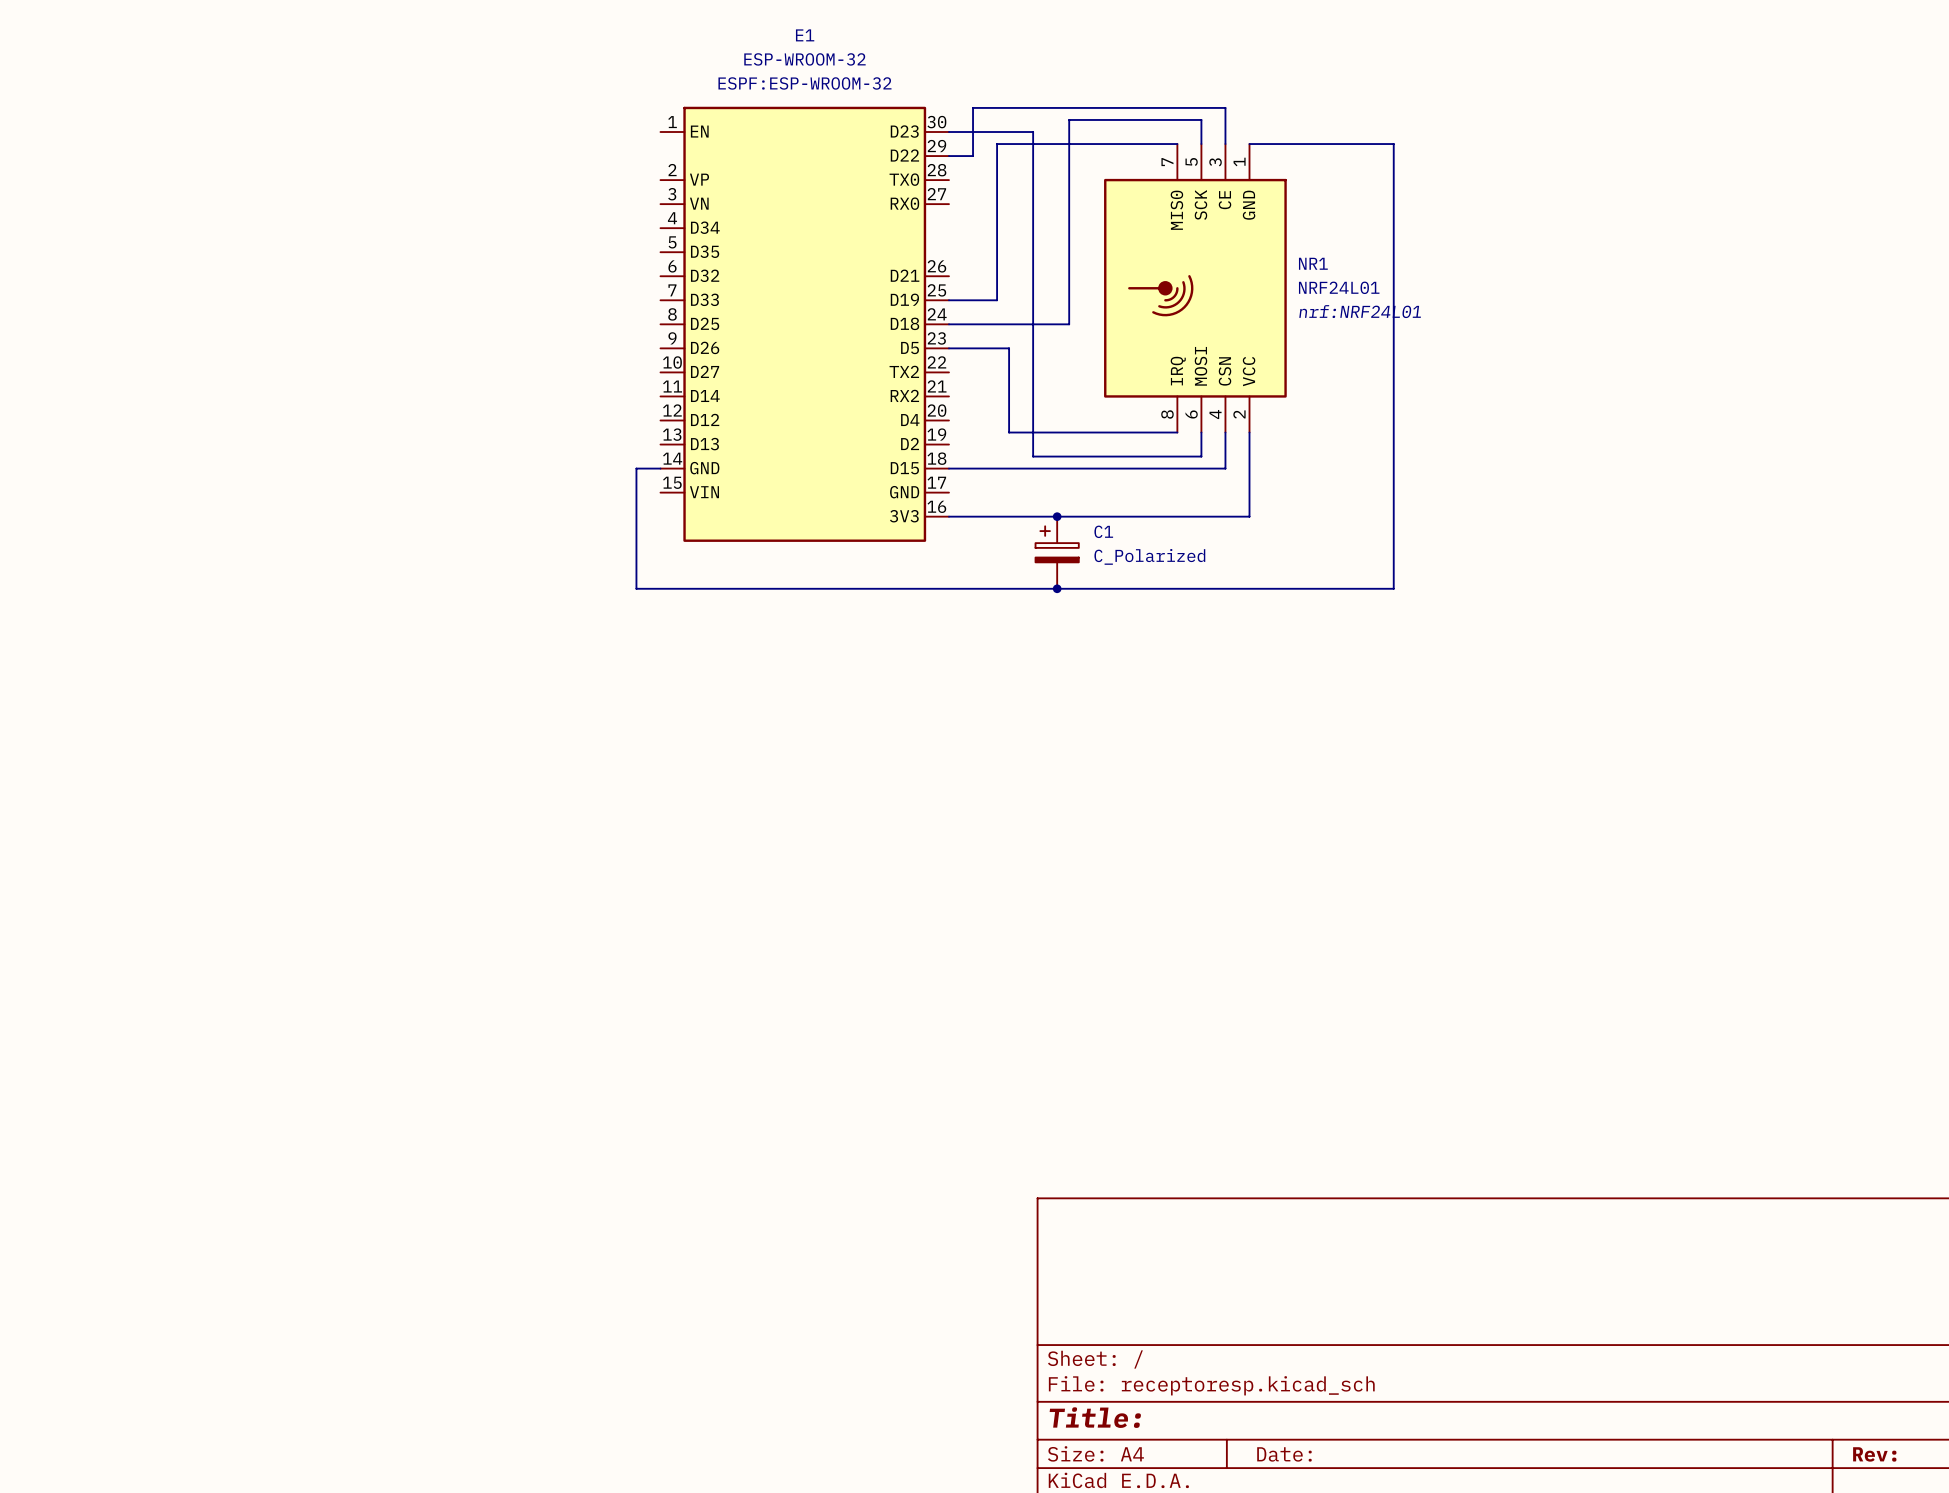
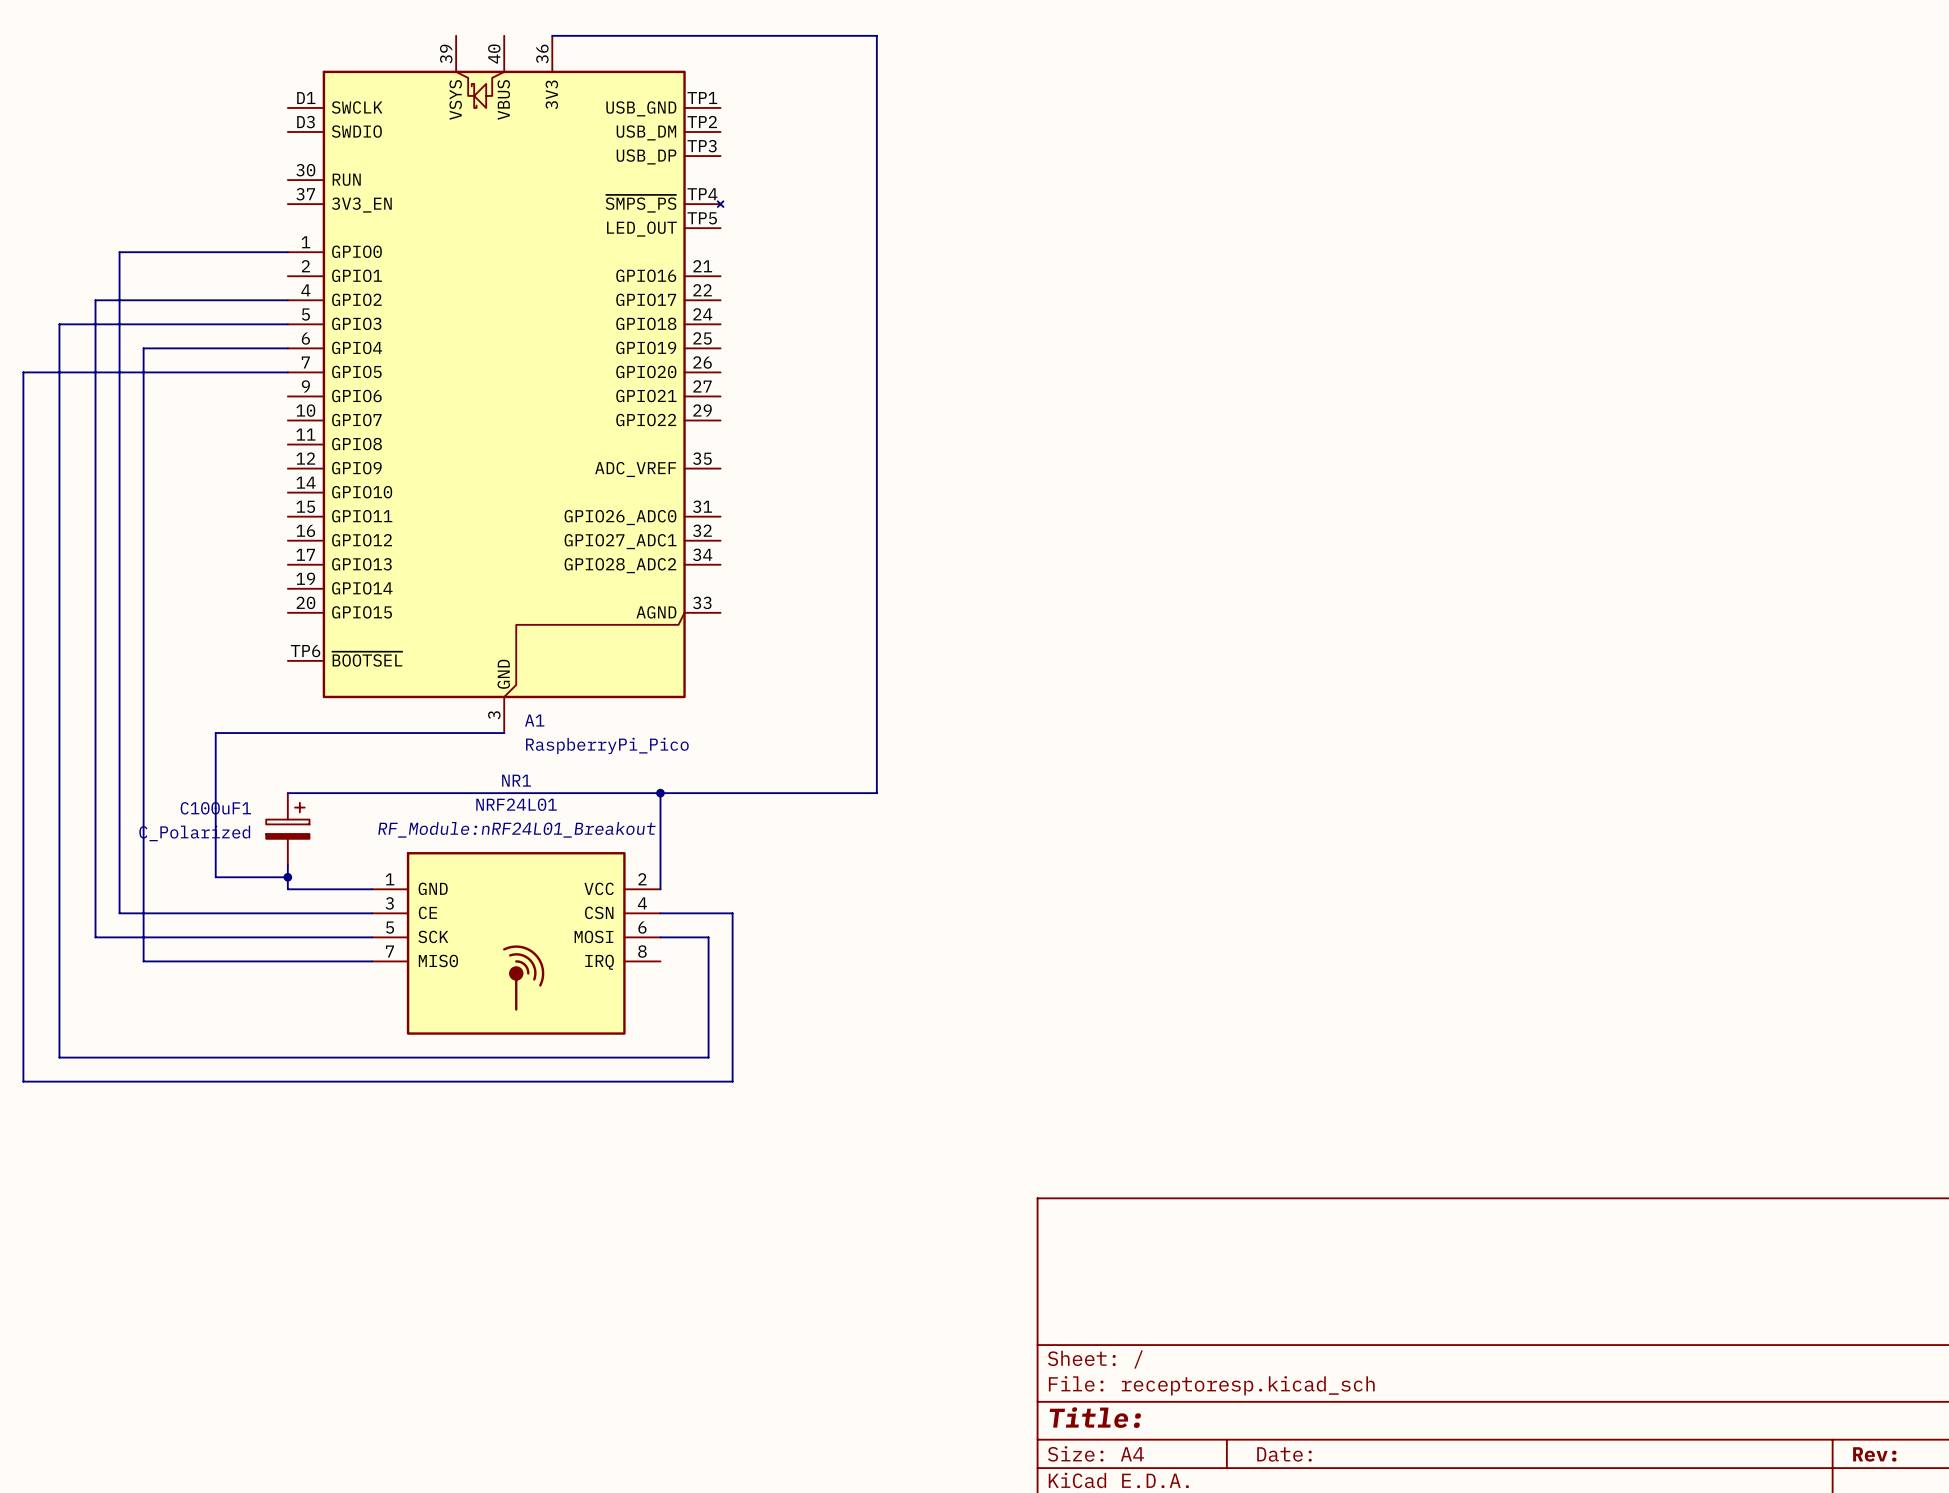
wire: none -> (552, 35) (876, 35) (876, 793) (287, 793)
wire: (948, 132) (1033, 132) (1033, 456) (1201, 456) (1201, 432) -> none
wire: (1177, 144) (997, 144) (997, 300) (948, 300) -> none
wire: (1201, 144) (1201, 119) (1069, 119) (1069, 324) (948, 324) -> none
wire: (1225, 144) (1225, 107) (973, 107) (973, 156) (948, 156) -> none
wire: (1249, 144) (1393, 144) (1393, 588) (636, 588) (636, 468) (660, 468) -> none
wire: none -> (287, 252) (119, 252) (119, 913) (371, 913)
NR1 name position: NR1 (1313, 263) -> NR1 (516, 780)
NR1 rotation: 0° (1141, 288) -> 90° counterclockwise (516, 996)
NR1 position: (1141, 288) -> (516, 996)
wire: none -> (287, 300) (95, 300) (95, 937) (371, 937)
NR1 text: nrf:NRF24L01 (1360, 311) -> RF_Module:nRF24L01_Breakout (516, 829)
wire: none -> (287, 324) (59, 324) (59, 1057) (708, 1057) (708, 937) (660, 937)
E1: ESP-WROOM-32 (804, 324) -> none
wire: none -> (287, 348) (143, 348) (143, 961) (371, 961)
wire: (948, 348) (1009, 348) (1009, 432) (1177, 432) -> none
wire: none -> (287, 372) (23, 372) (23, 1081) (732, 1081) (732, 913) (660, 913)
A1: none -> RaspberryPi_Pico (505, 384)
wire: (1225, 432) (1225, 468) (948, 468) -> none
wire: (1249, 432) (1249, 516) (948, 516) -> none
junction: (1057, 516) -> none
C1: C_Polarized (1057, 552) -> none
junction: (1057, 588) -> none
wire: none -> (504, 733) (215, 733) (215, 877) (287, 877)
wire: none -> (660, 793) (660, 889)
junction: none -> (660, 793)
C100uF1: none -> C_Polarized (287, 829)
wire: none -> (287, 865) (287, 889) (371, 889)
junction: none -> (287, 877)

